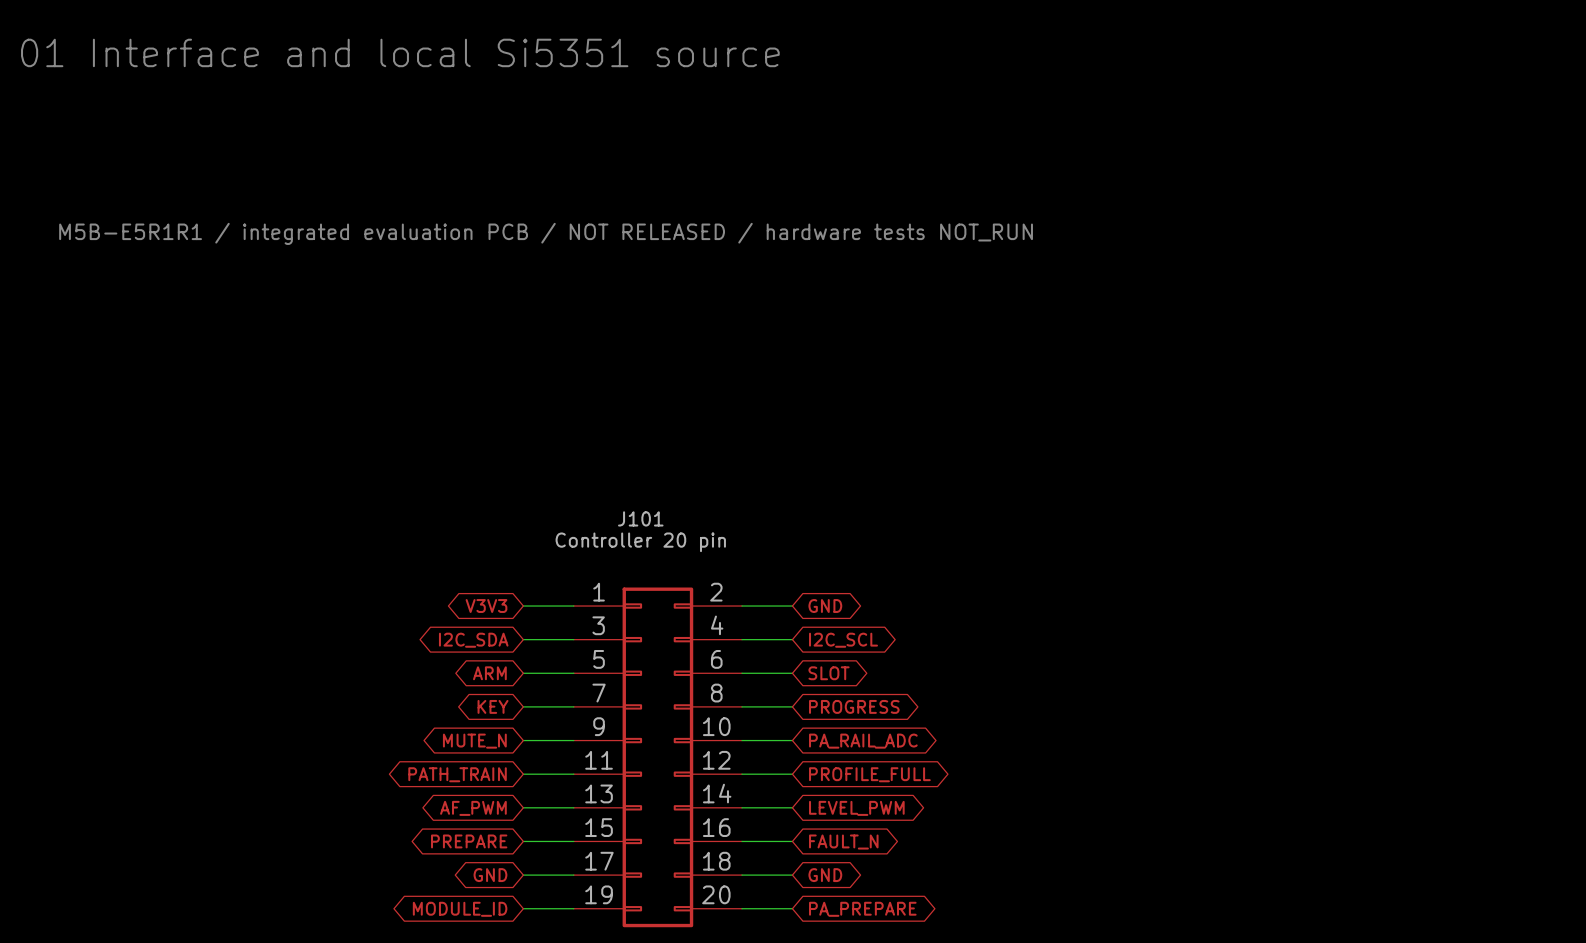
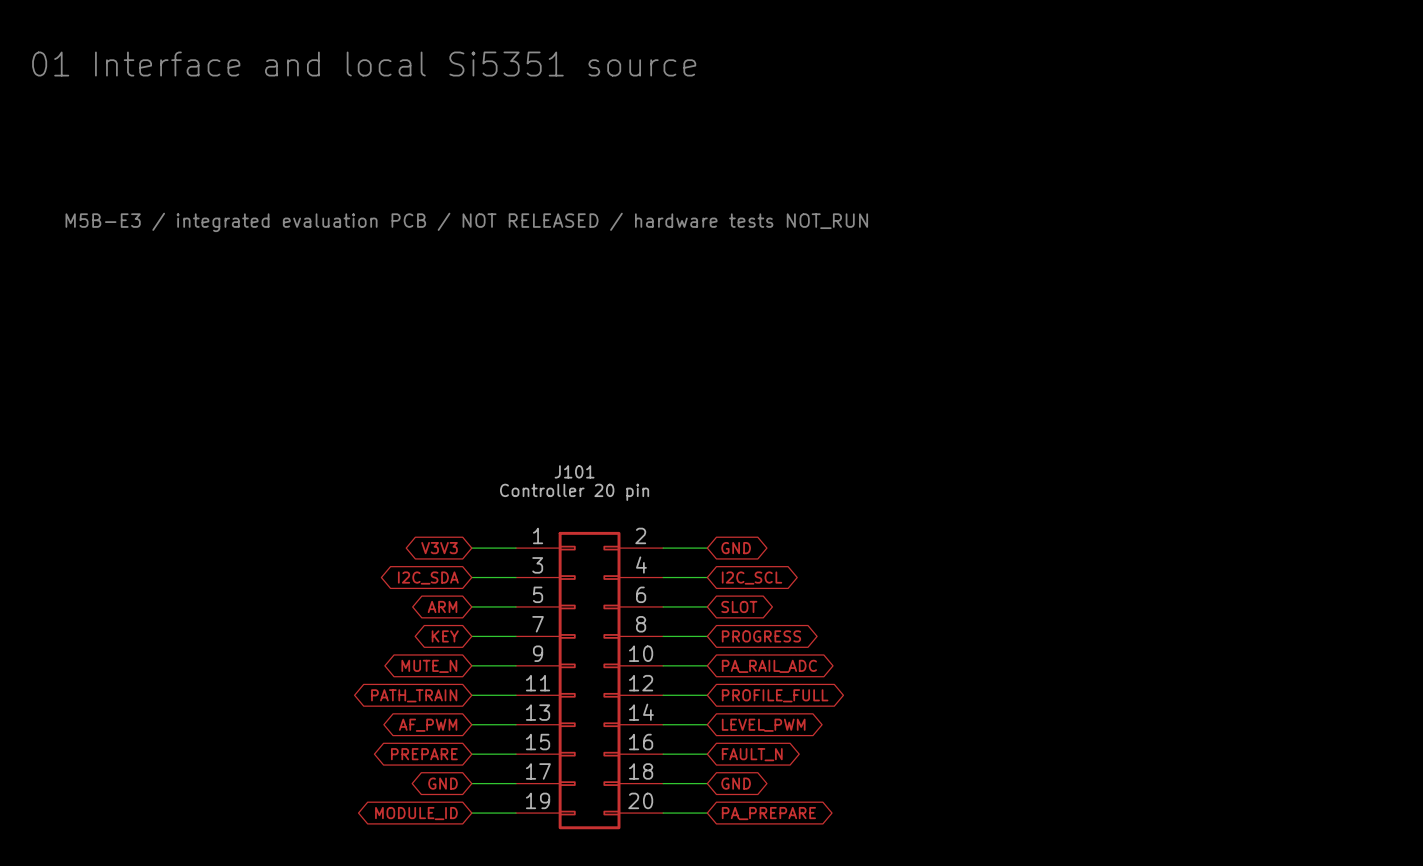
text: M5B-E5R1R1 / integrated evaluation PCB / NOT RELEASED / hardware tests NOT_RUN (546, 233) -> M5B-E3 / integrated evaluation PCB / NOT RELEASED / hardware tests NOT_RUN (466, 222)

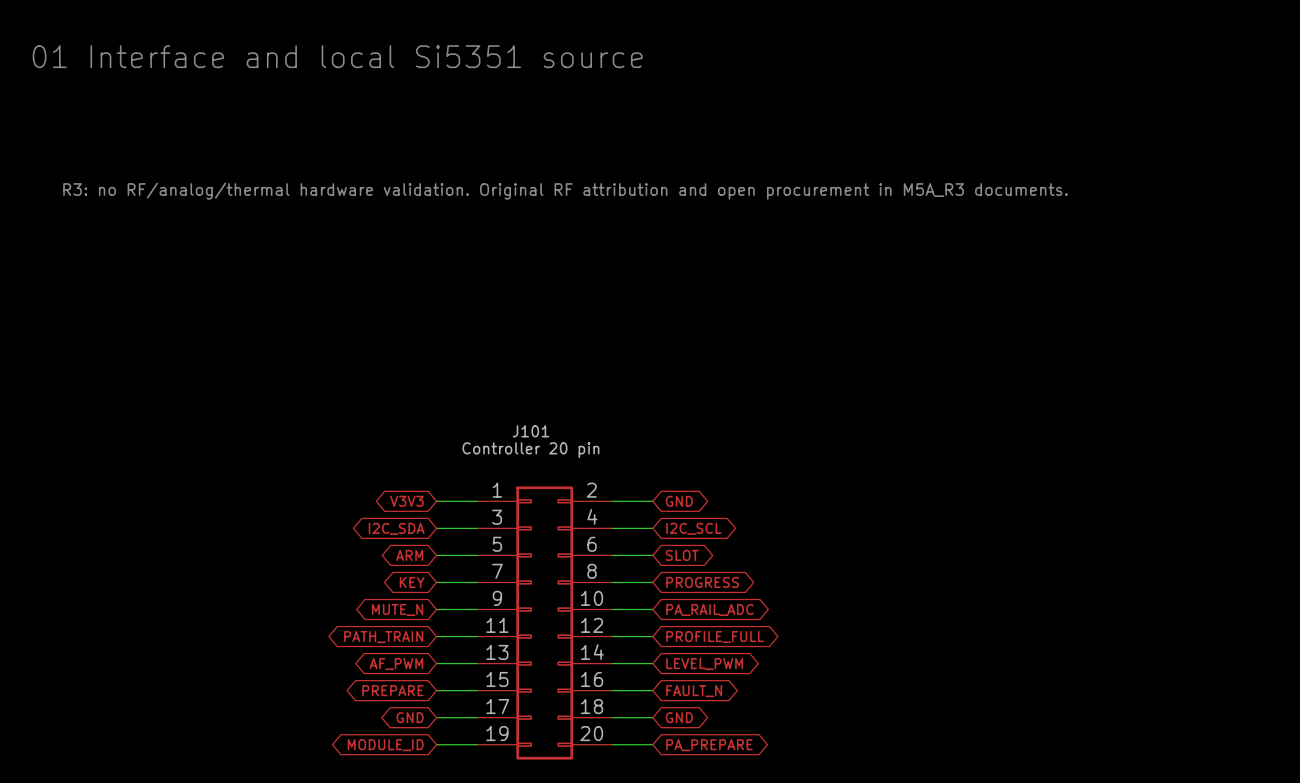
text: M5B-E3 / integrated evaluation PCB / NOT RELEASED / hardware tests NOT_RUN (466, 222) -> R3: no RF/analog/thermal hardware validation. Original RF attribution and open procurement in M5A_R3 documents. (565, 191)

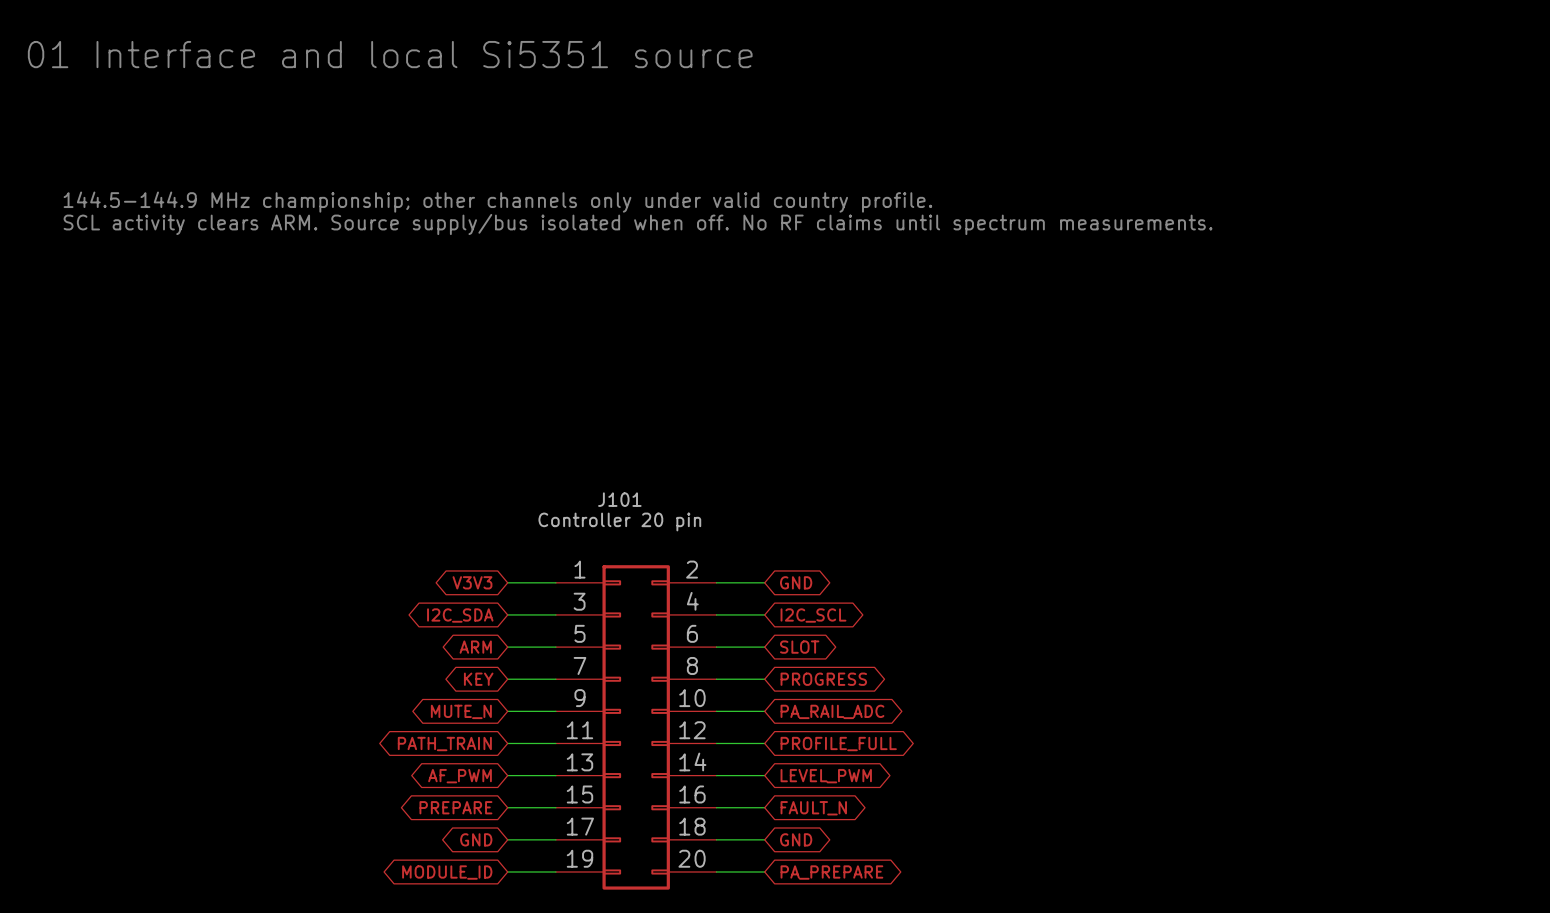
text: none -> 144.5-144.9 MHz championship; other channels only under valid country profile. (497, 202)
text: R3: no RF/analog/thermal hardware validation. Original RF attribution and open procurement in M5A_R3 documents. (565, 191) -> none
text: none -> SCL activity clears ARM. Source supply/bus isolated when off. No RF claims until spectrum measurements. (638, 224)

